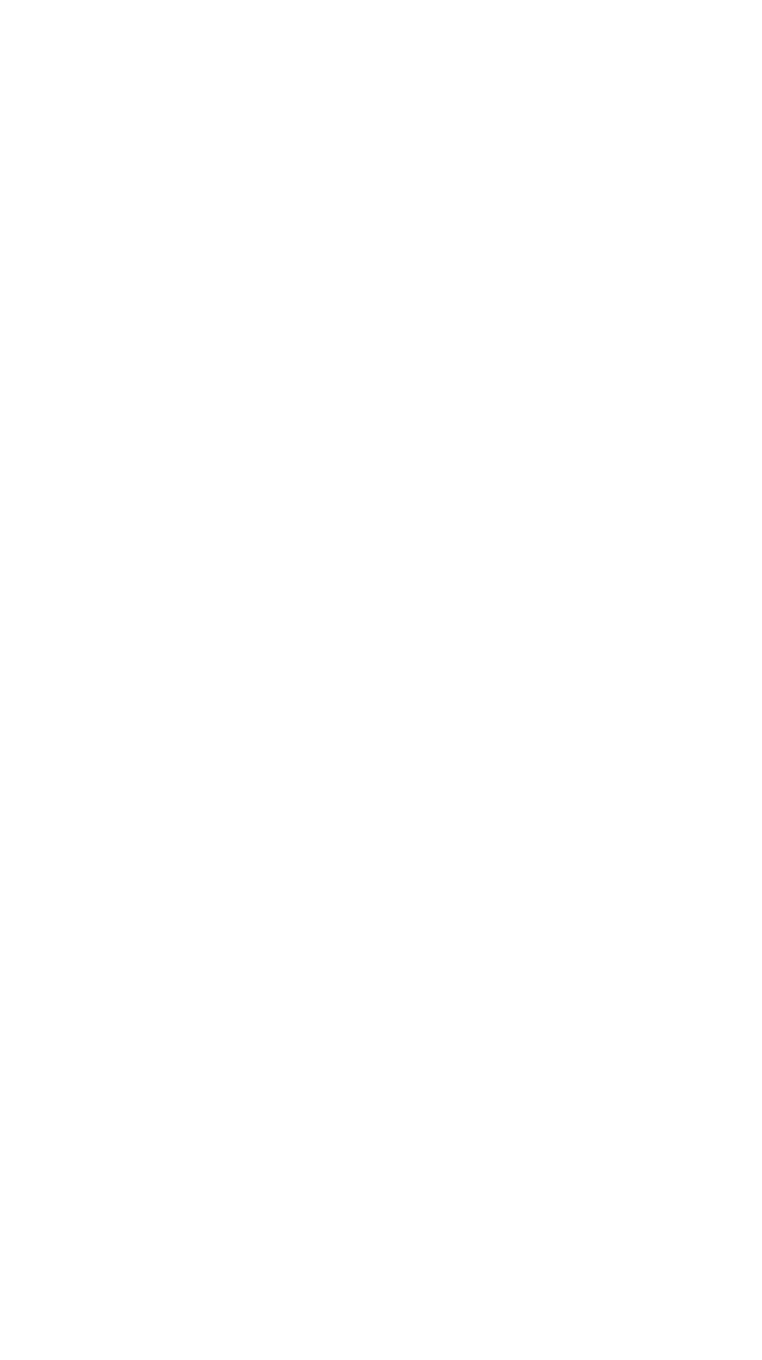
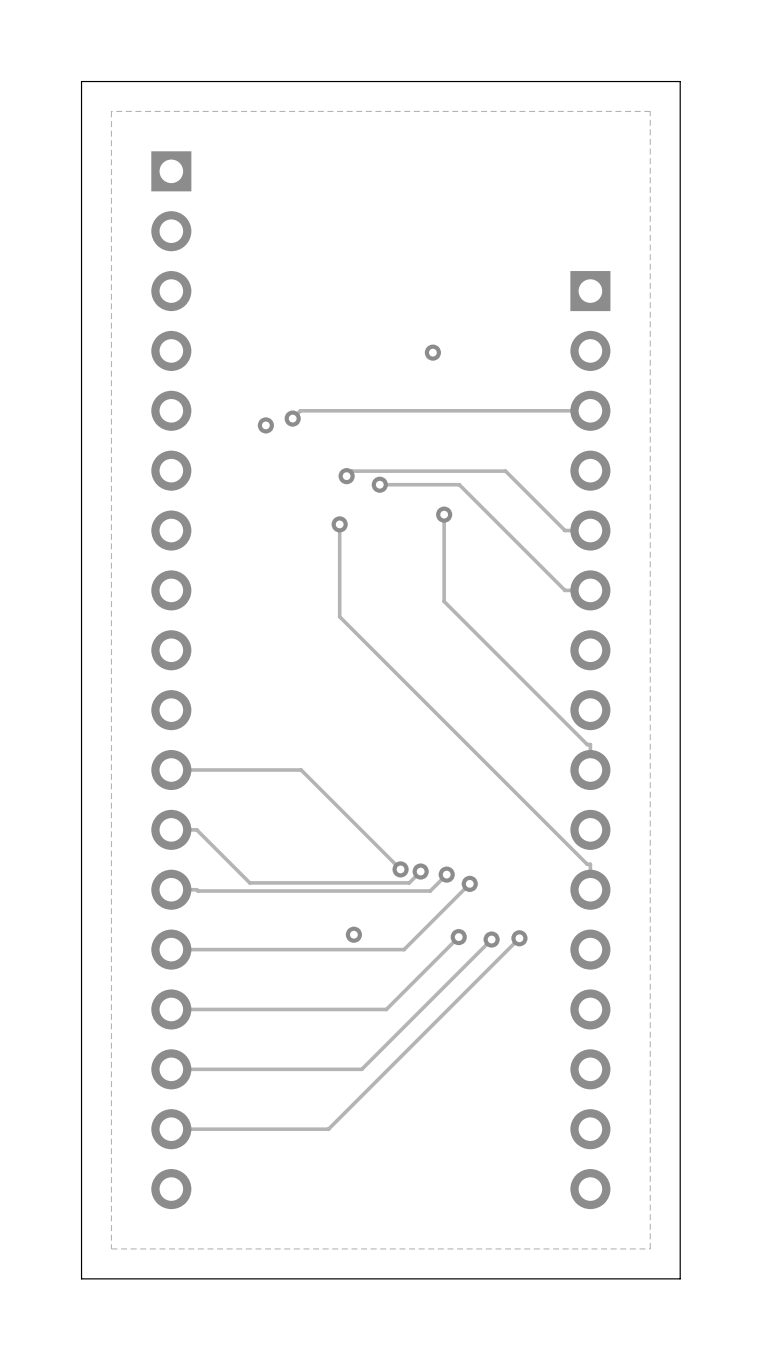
board edge: none -> (680, 81) (680, 1278) (81, 1278) (81, 81) (680, 81)
zone outline: none -> (650, 111) (650, 1248) (111, 1248) (111, 111) (650, 111)
via: none -> (432, 352)
track: none -> (590, 410) (300, 410) (292, 418)
via: none -> (292, 418)
via: none -> (265, 425)
track: none -> (346, 476) (351, 471) (505, 471) (564, 530) (590, 530)
via: none -> (346, 476)
track: none -> (379, 484) (459, 484) (564, 590) (590, 590)
via: none -> (379, 484)
track: none -> (444, 514) (444, 601) (587, 744) (590, 744) (590, 770)
via: none -> (444, 514)
track: none -> (339, 524) (339, 616) (587, 864) (590, 864) (590, 889)
via: none -> (339, 524)
part: none -> (171, 680)
part: none -> (590, 740)
track: none -> (171, 770) (301, 770) (400, 869)
track: none -> (171, 829) (196, 829) (249, 882) (409, 882) (420, 871)
via: none -> (400, 869)
via: none -> (420, 871)
track: none -> (446, 874) (430, 891) (171, 889)
via: none -> (446, 874)
track: none -> (469, 883) (404, 949) (171, 949)
via: none -> (469, 883)
via: none -> (353, 934)
track: none -> (458, 937) (386, 1009) (171, 1009)
via: none -> (458, 937)
track: none -> (519, 938) (328, 1129) (171, 1129)
via: none -> (519, 938)
track: none -> (491, 939) (361, 1069) (171, 1069)
via: none -> (491, 939)

